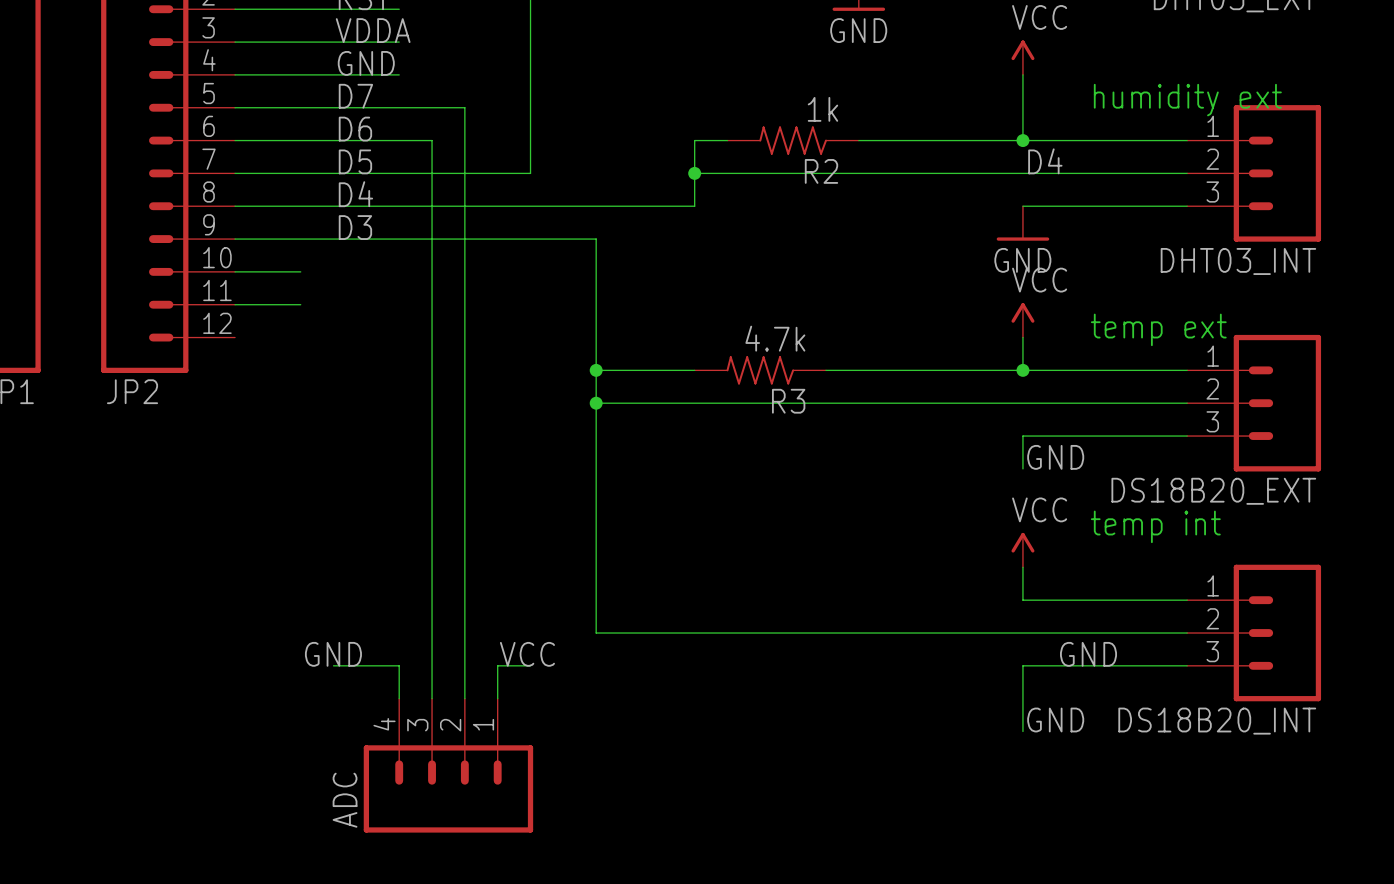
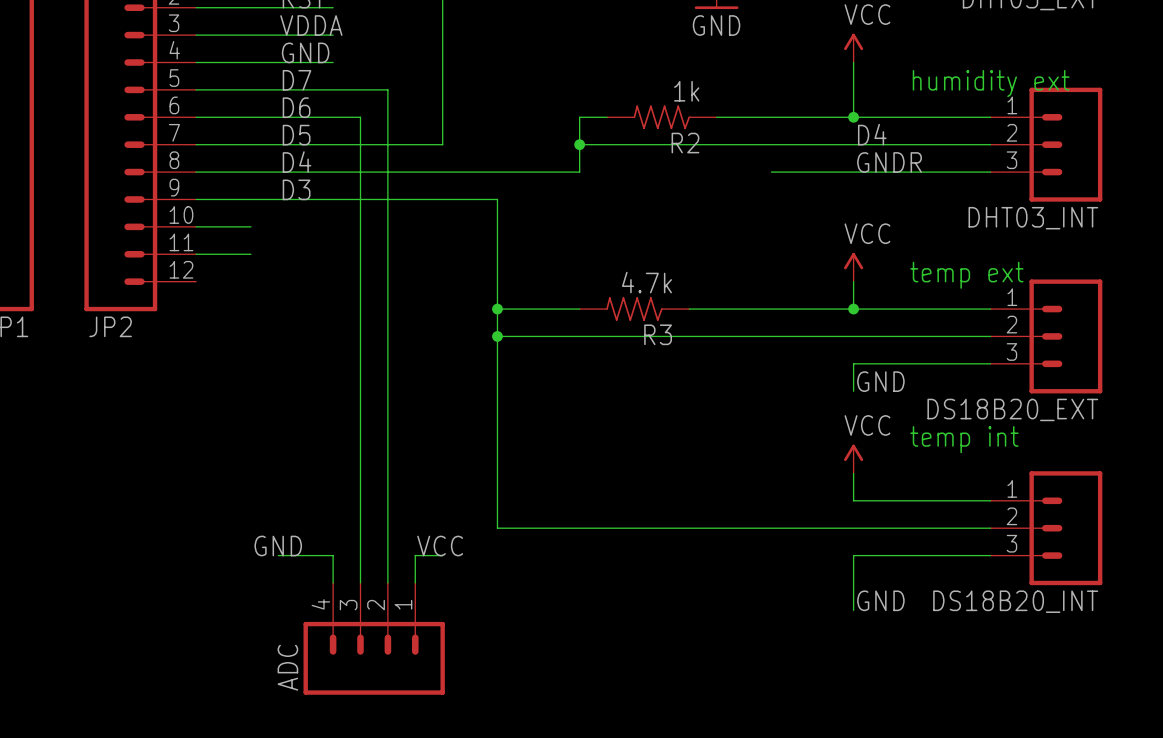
label: none -> GNDR (889, 162)
wire: none -> (771, 172) (853, 172)
power symbol: GND (1022, 223) -> none
label: GND (1088, 654) -> none

